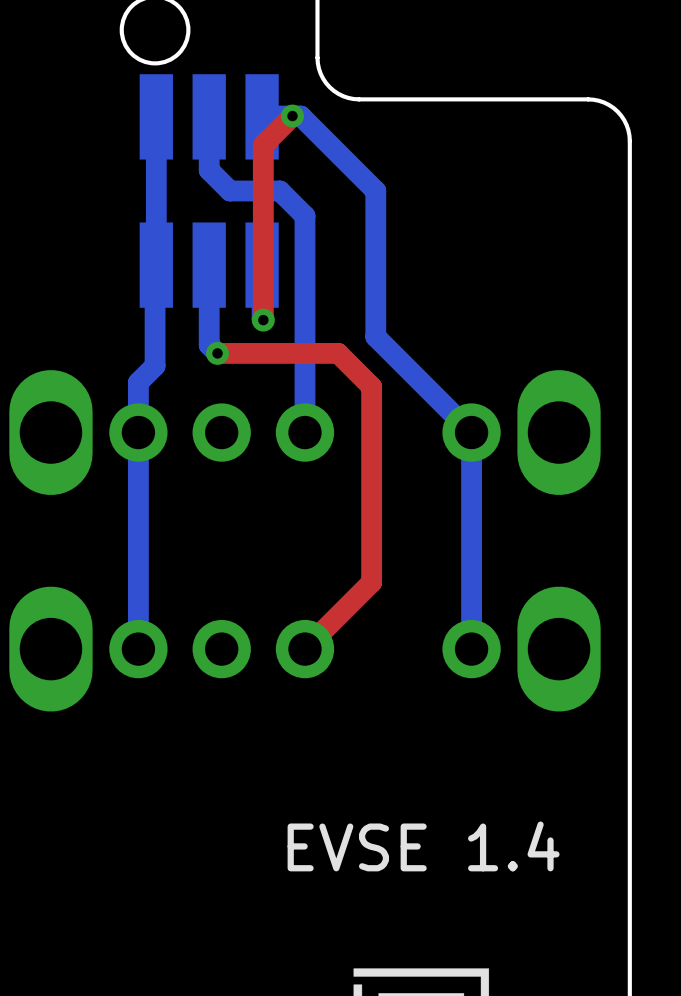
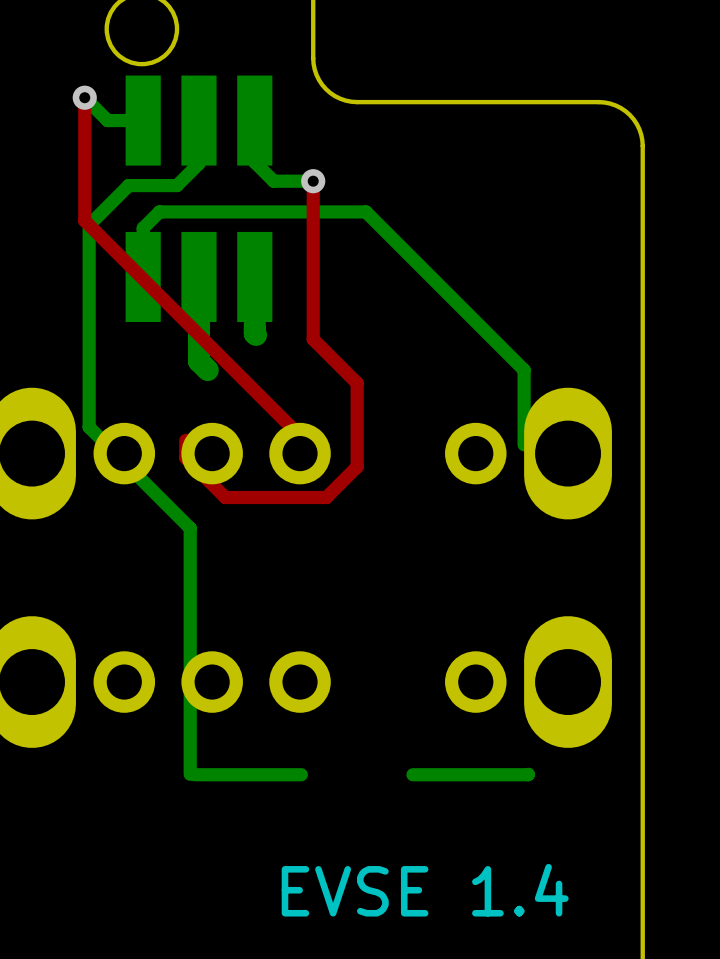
top track: none -> (84, 97) (84, 220) (304, 440)
via: none -> (84, 97)
bottom track: (156, 116) (156, 218) -> (143, 120) (107, 120) (84, 97)
bottom track: (263, 116) (300, 116) (375, 191) (375, 336) (471, 432) (471, 649) -> none
top track: (292, 116) (263, 145) (263, 320) -> none
via position: (292, 116) -> (313, 181)
bottom track: none -> (254, 153) (254, 162) (273, 181) (313, 181)
bottom track: (209, 157) (209, 170) (230, 191) (280, 191) (304, 215) (304, 432) -> (198, 163) (177, 185) (128, 185) (89, 225) (89, 427) (190, 528) (190, 774)
top track: none -> (313, 181) (313, 339) (357, 383) (357, 466) (326, 497) (225, 497) (185, 457) (185, 440)
bottom track: none -> (143, 228) (159, 211) (365, 211) (524, 370) (524, 444)
bottom track: (155, 265) (155, 365) (138, 382) (138, 649) -> none
via: (263, 320) -> none
top track: (217, 353) (338, 353) (371, 386) (371, 582) (304, 649) -> none
via: (217, 353) -> none
bottom track: none -> (195, 774) (301, 774)
bottom track: none -> (412, 774) (528, 774)

